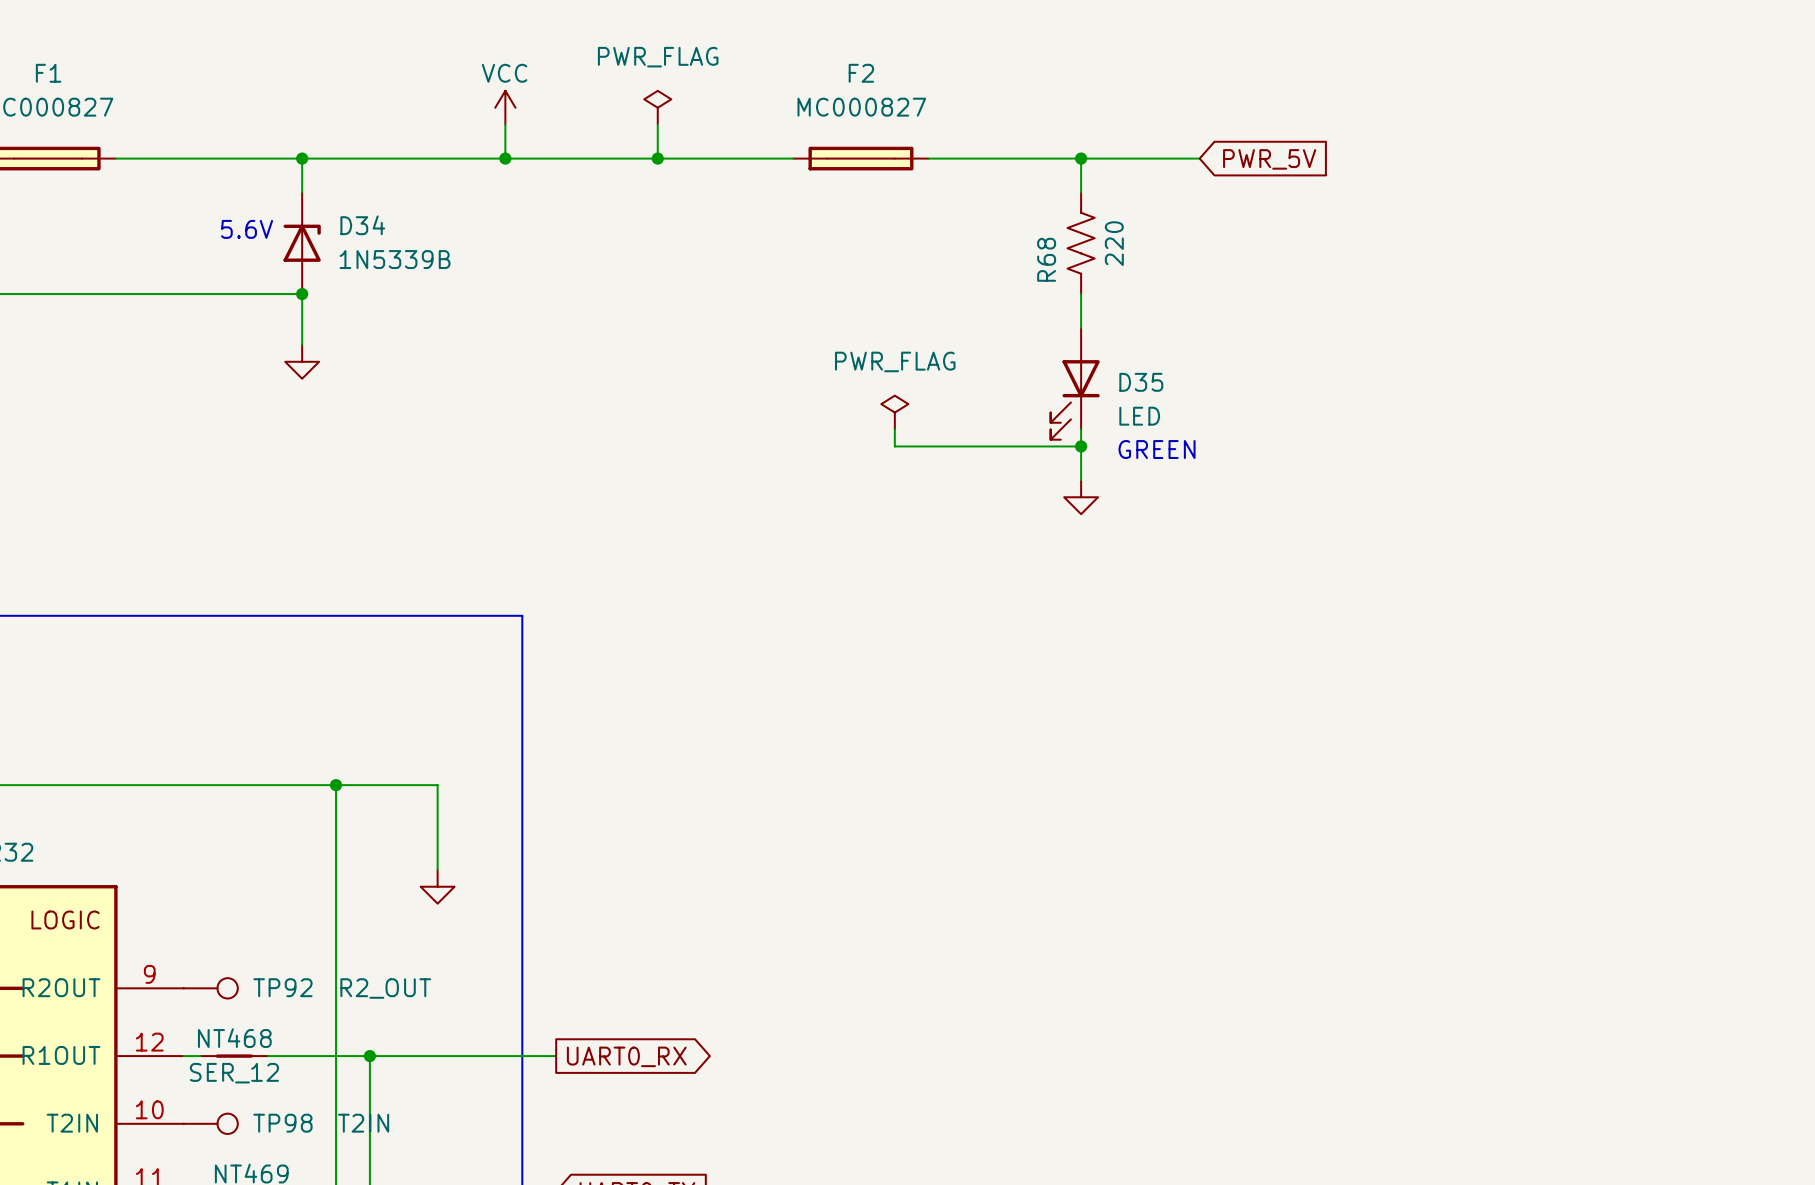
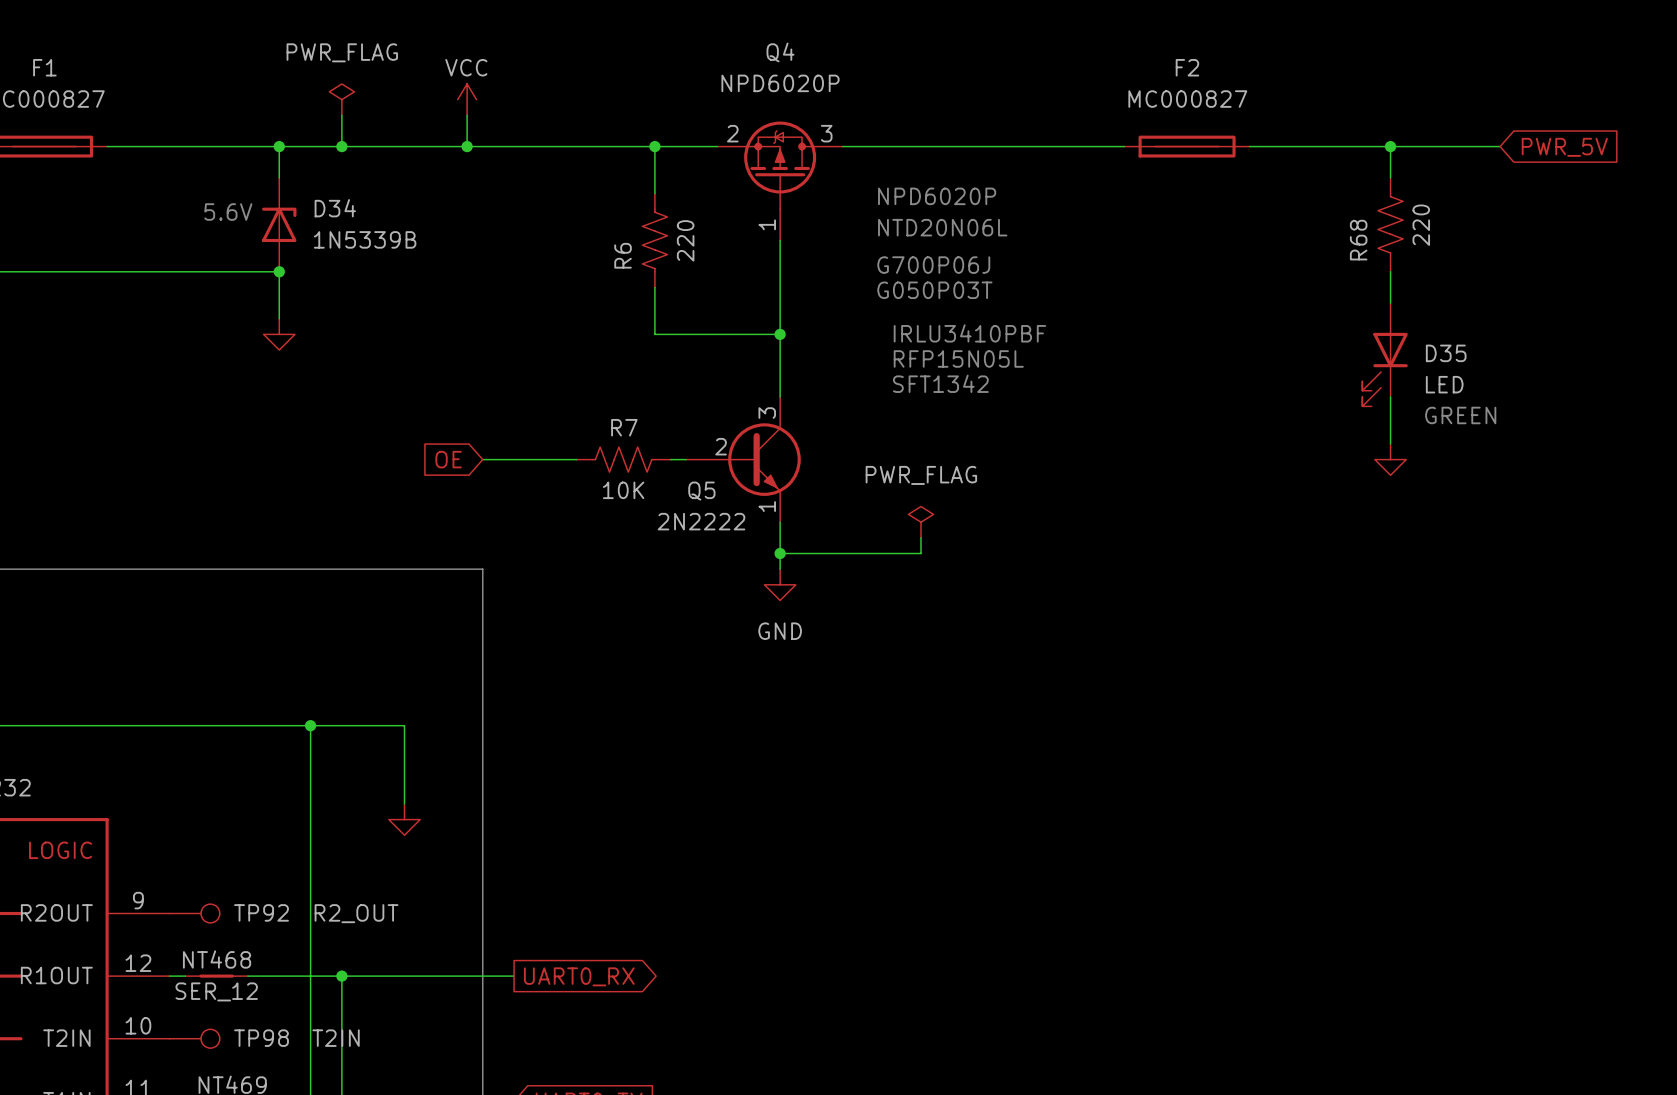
power symbol: none -> PWR_FLAG (341, 99)
power symbol: PWR_FLAG (657, 107) -> none
wire: (657, 124) (657, 158) -> (341, 115) (341, 146)
junction: none -> (341, 146)
junction position: (657, 158) -> (654, 146)
wire: none -> (654, 146) (654, 193)
F2 position: (860, 158) -> (1187, 146)
wire: (1081, 158) (1081, 192) -> none
junction: (1081, 158) -> none
wire: none -> (1108, 146) (1124, 146)
wire: none -> (1249, 146) (1500, 146)
wire: none -> (1390, 146) (1390, 177)
junction: none -> (1390, 146)
global label: PWR_5V (1269, 159) -> none
global label: none -> PWR_5V (1564, 147)
Q4: none -> NPD6020P (780, 181)
text: none -> NPD6020P (937, 196)
R68 position: (1081, 243) -> (1390, 224)
text: none -> NTD20N06L (942, 227)
R6: none -> 220 (654, 240)
wire: none -> (780, 240) (780, 397)
text: none -> G700P06J (933, 265)
wire: (1081, 294) (1081, 327) -> none
wire: none -> (1390, 271) (1390, 303)
wire: none -> (654, 287) (654, 334) (780, 334)
text: none -> G050P03T (934, 290)
text: none -> IRLU3410PBF (969, 333)
junction: none -> (780, 334)
D35 position: (1075, 383) -> (1385, 354)
text: none -> RFP15N05L (958, 358)
power symbol position: PWR_FLAG (894, 412) -> PWR_FLAG (920, 522)
text: none -> SFT1342 (940, 383)
wire: (894, 429) (894, 446) (1081, 446) -> none
wire: (1081, 429) (1081, 480) -> (780, 522) (780, 569)
wire: none -> (1390, 397) (1390, 443)
junction: (1081, 446) -> none
text: GREEN (1157, 449) -> none
text: none -> GREEN (1460, 415)
global label: none -> OE (448, 459)
wire: none -> (482, 459) (576, 459)
R7: none -> 10K (623, 459)
wire: none -> (670, 459) (686, 459)
Q5: none -> 2N2222 (743, 459)
power symbol: (1081, 497) -> none
power symbol: none -> (1390, 459)
wire: none -> (920, 537) (920, 553) (780, 553)
junction: none -> (780, 553)
power symbol: none -> GND (780, 584)

